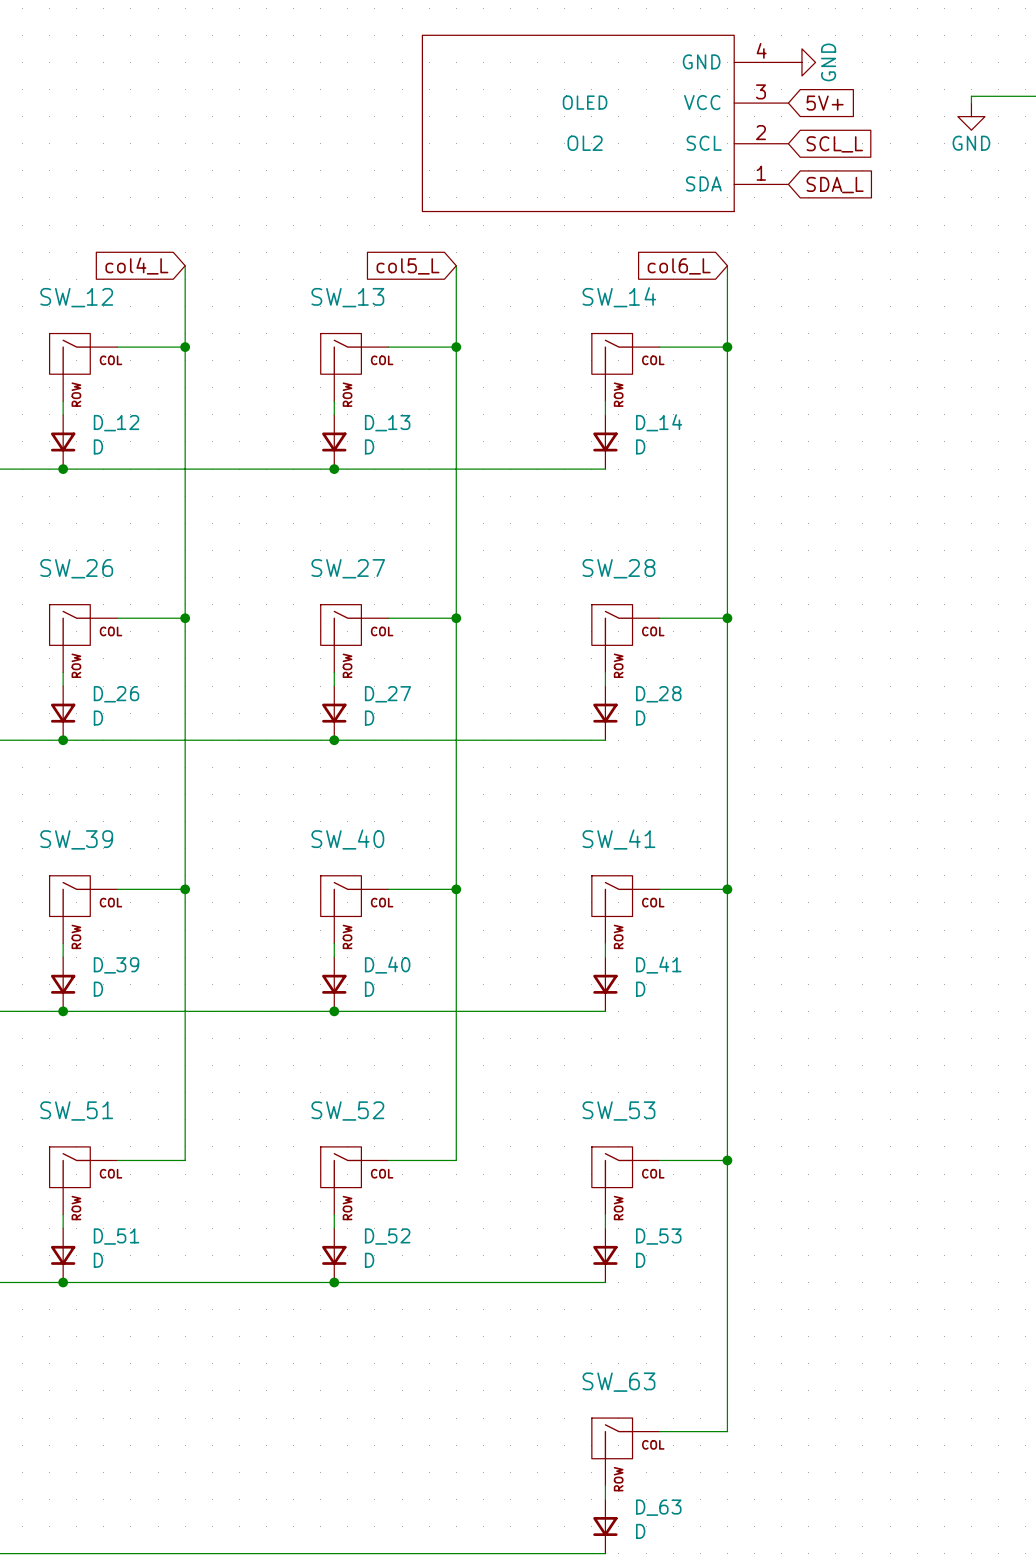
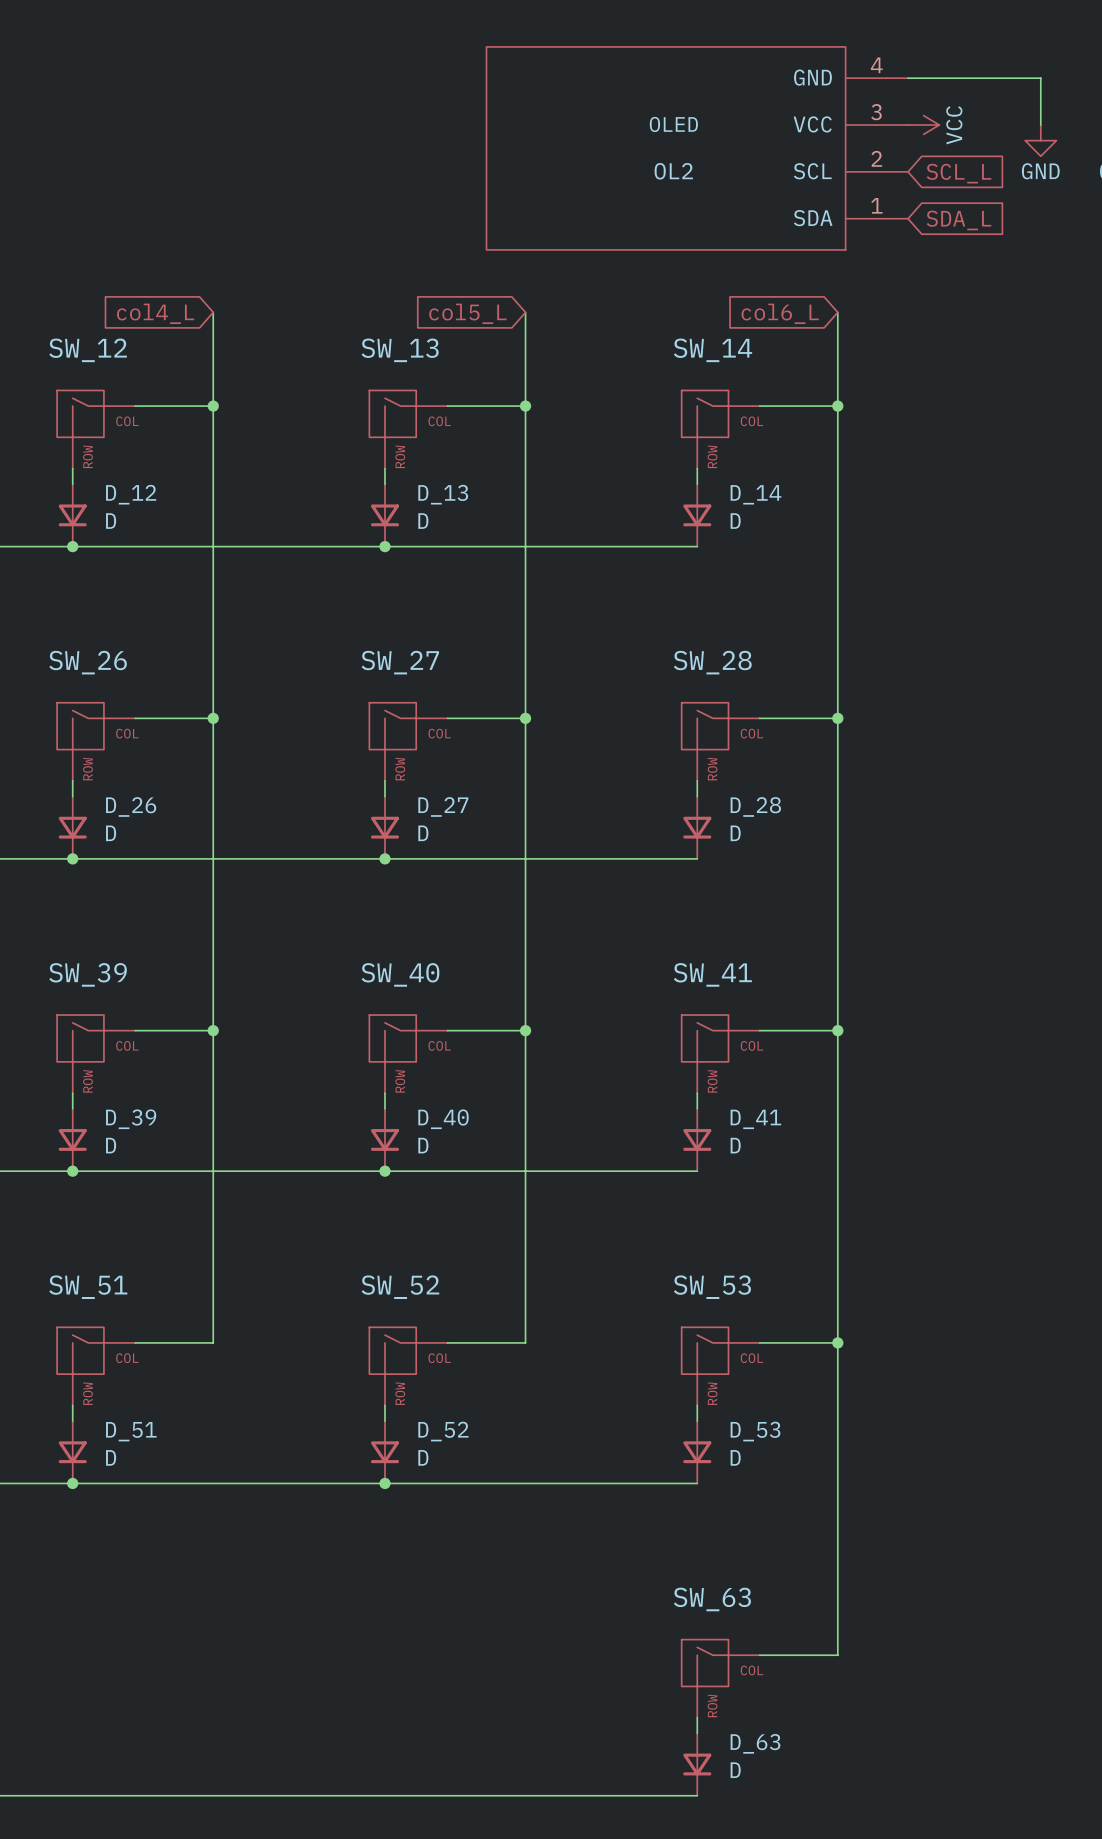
wire: none -> (908, 78) (1040, 78) (1040, 125)
power symbol rotation: 0° (801, 62) -> 90° clockwise (1040, 140)
power symbol position: GND (801, 62) -> GND (1040, 140)
power symbol: none -> VCC (923, 125)
global label: 5V+ (825, 103) -> none

